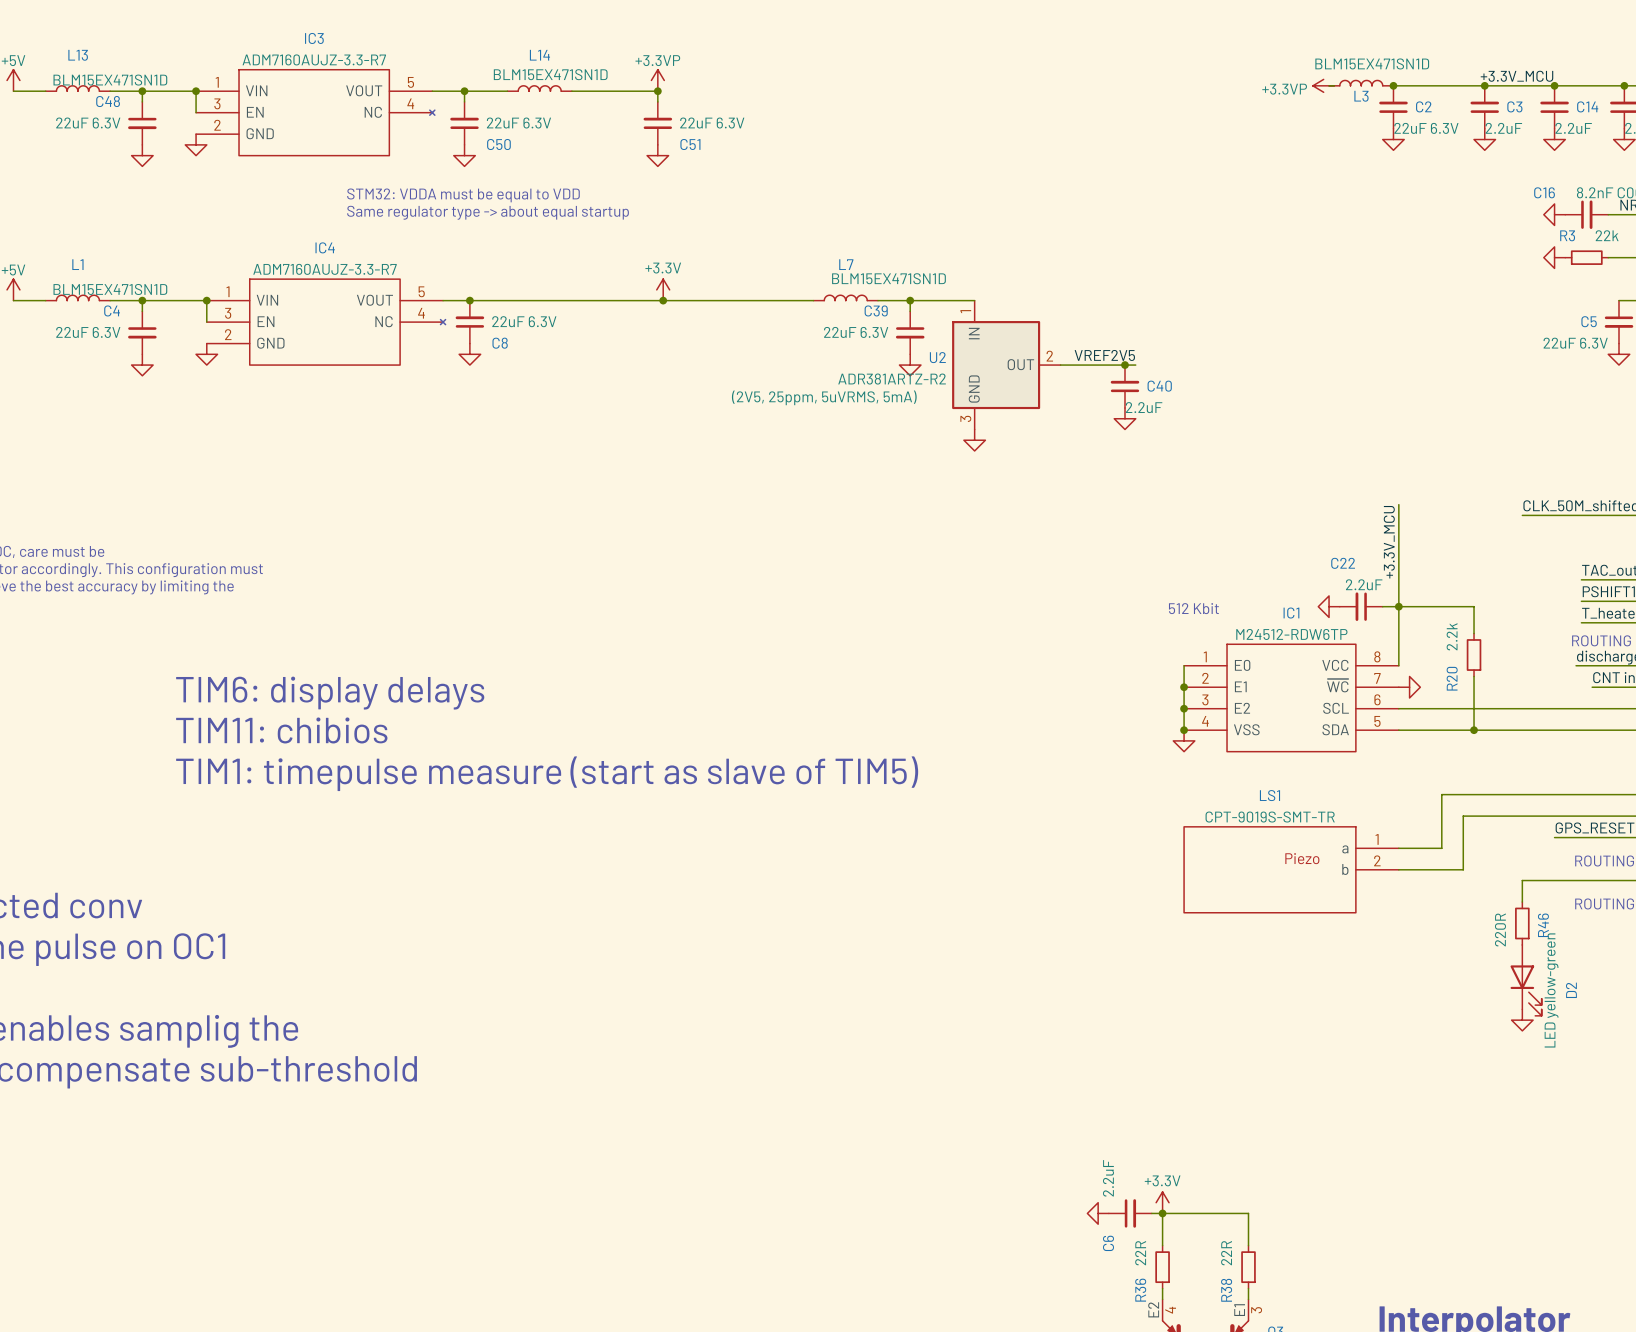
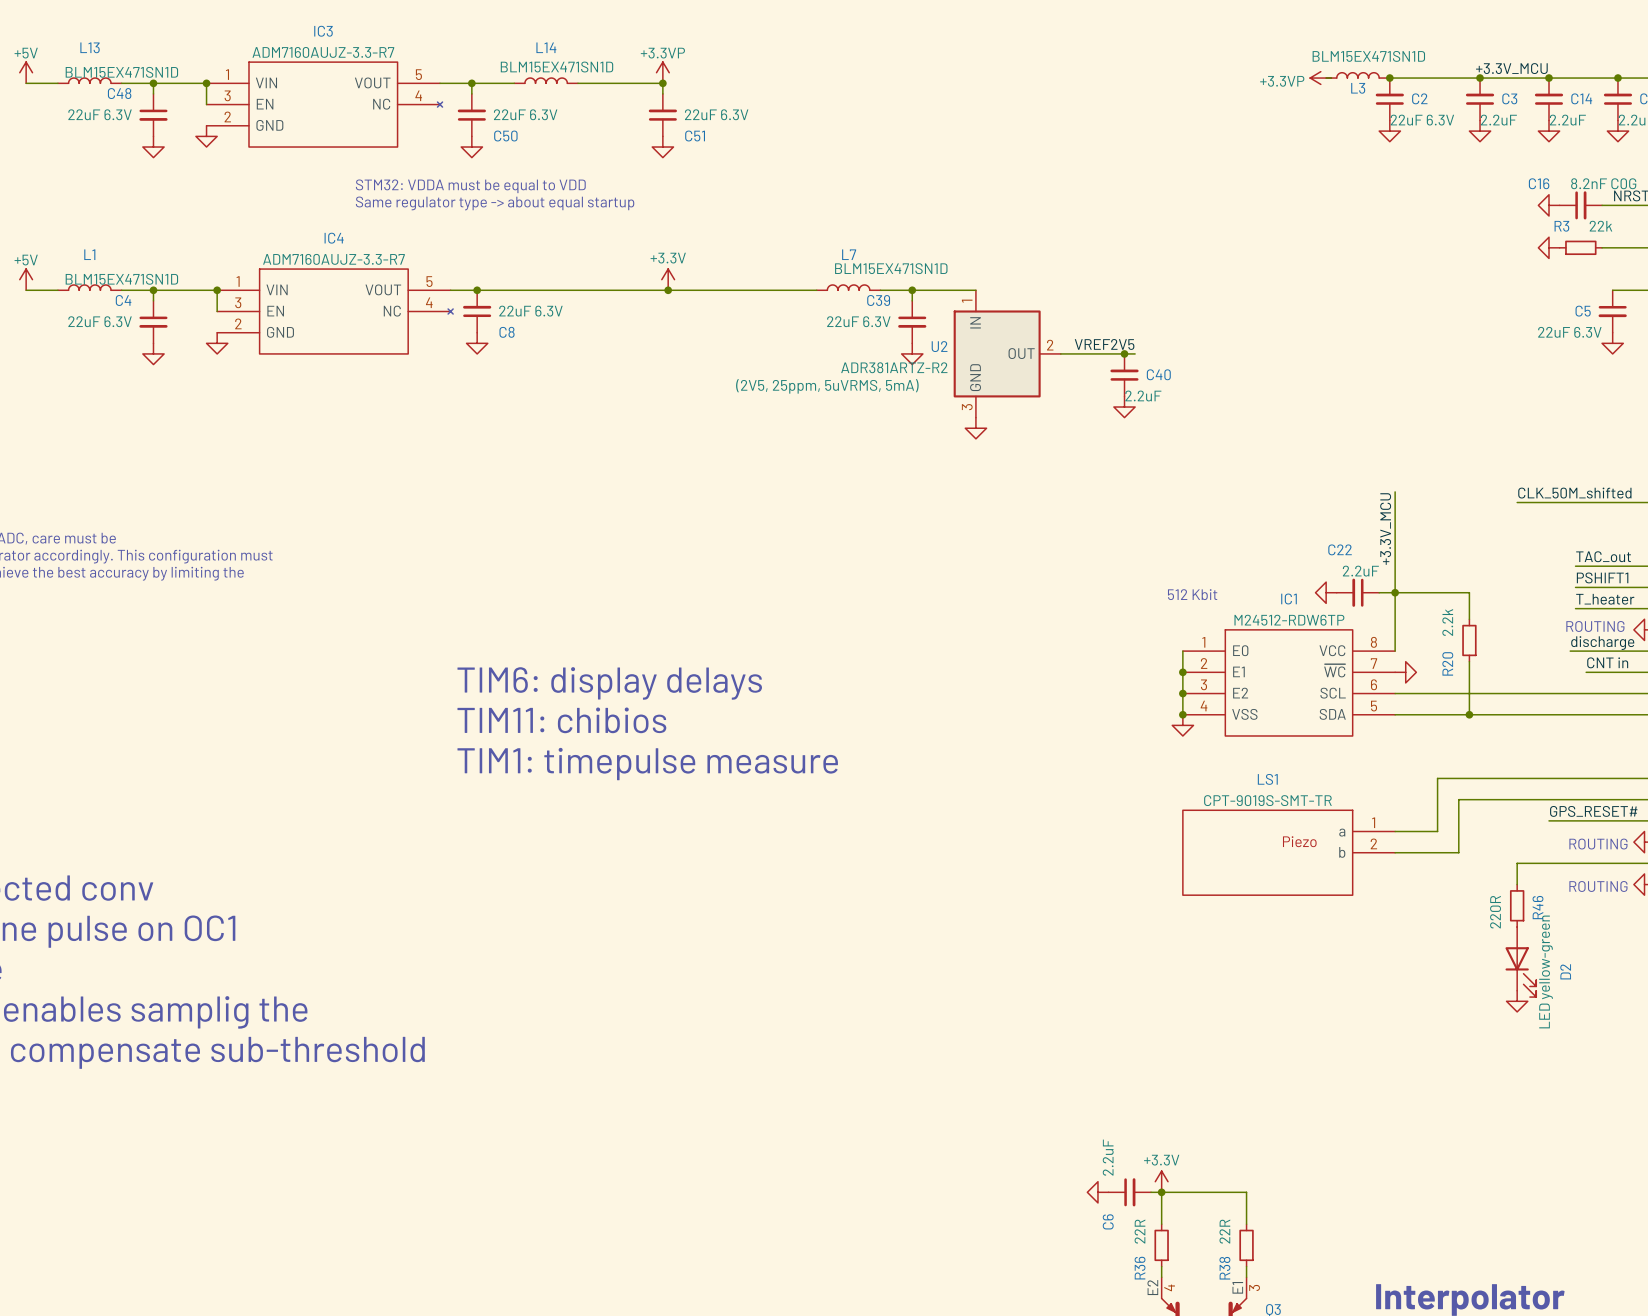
text: TIM6: display delays (330, 693) -> none
text: none -> TIM6: display delays (609, 683)
text: TIM11: chibios (281, 730) -> none
text: none -> TIM11: chibios (561, 720)
text: TIM1: timepulse measure (start as slave of TIM5) (547, 773) -> none
text: none -> TIM1: timepulse measure (647, 764)

